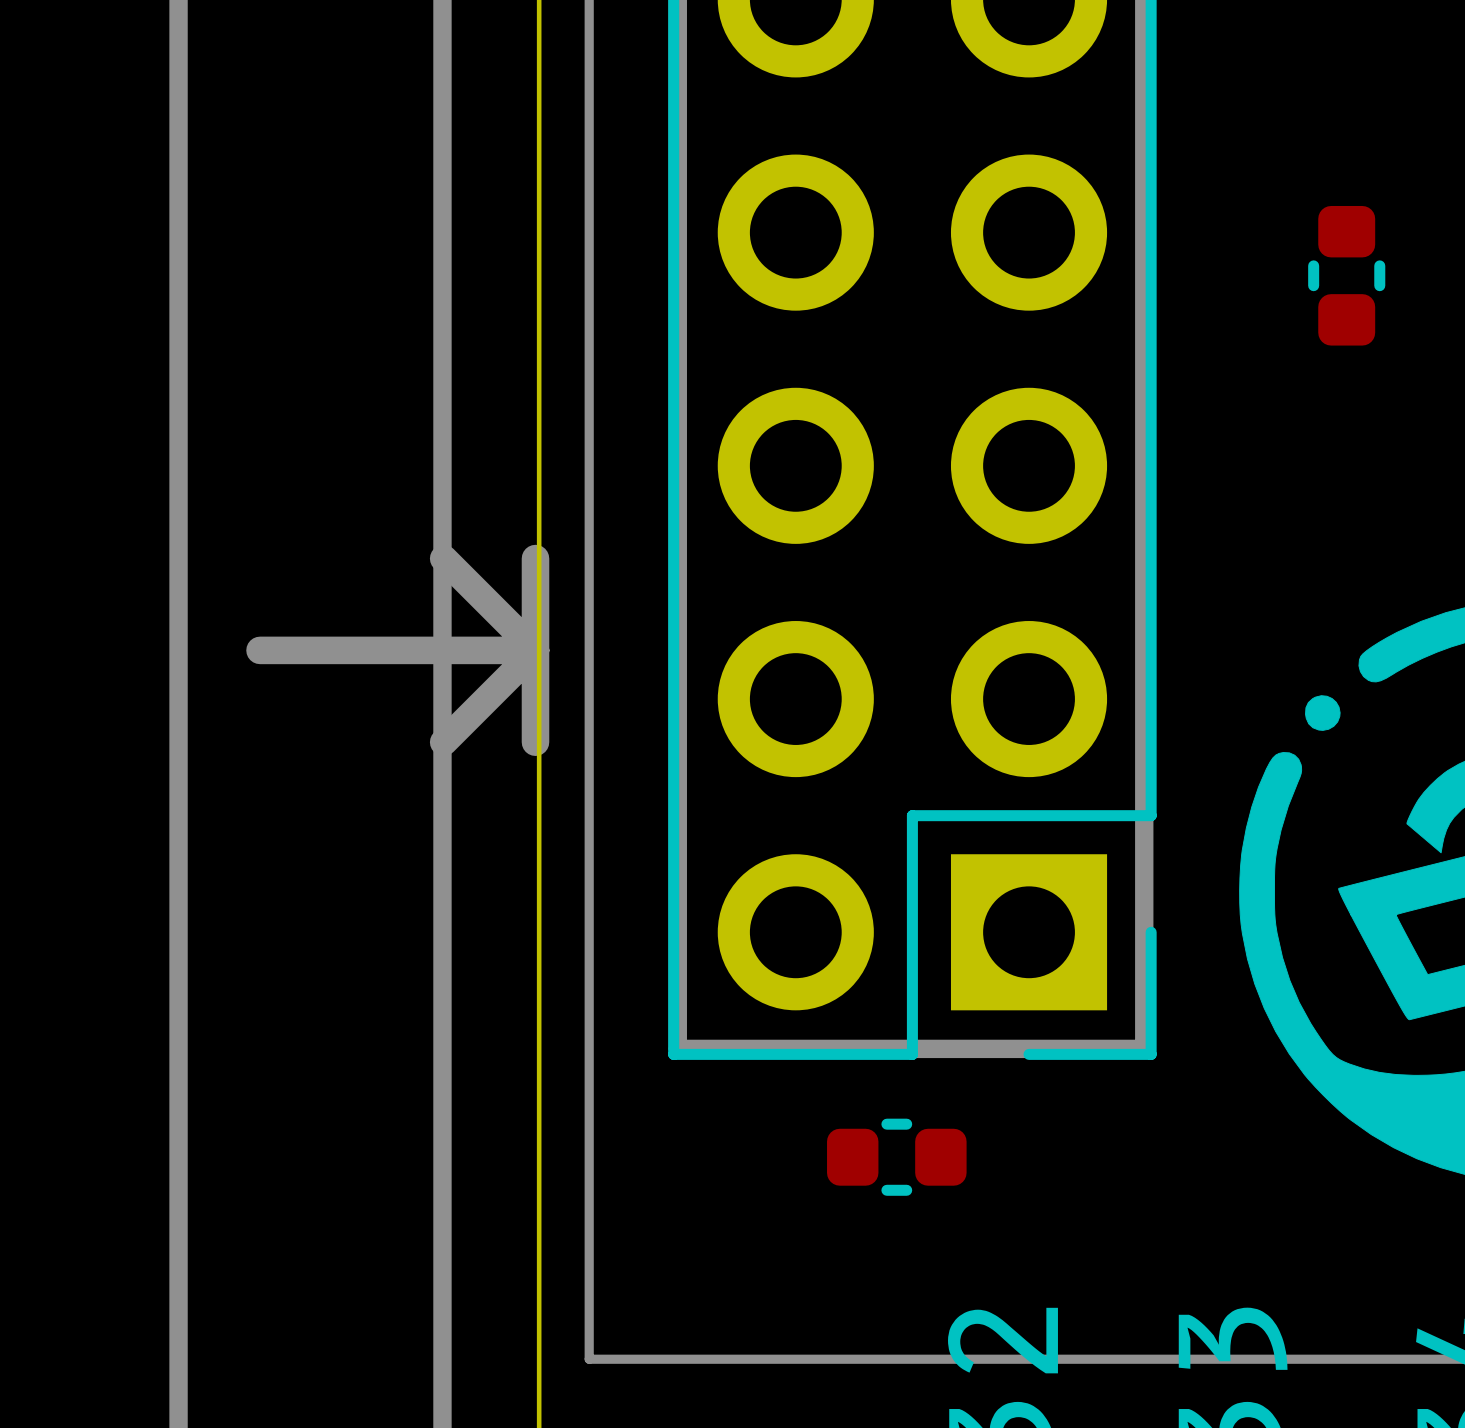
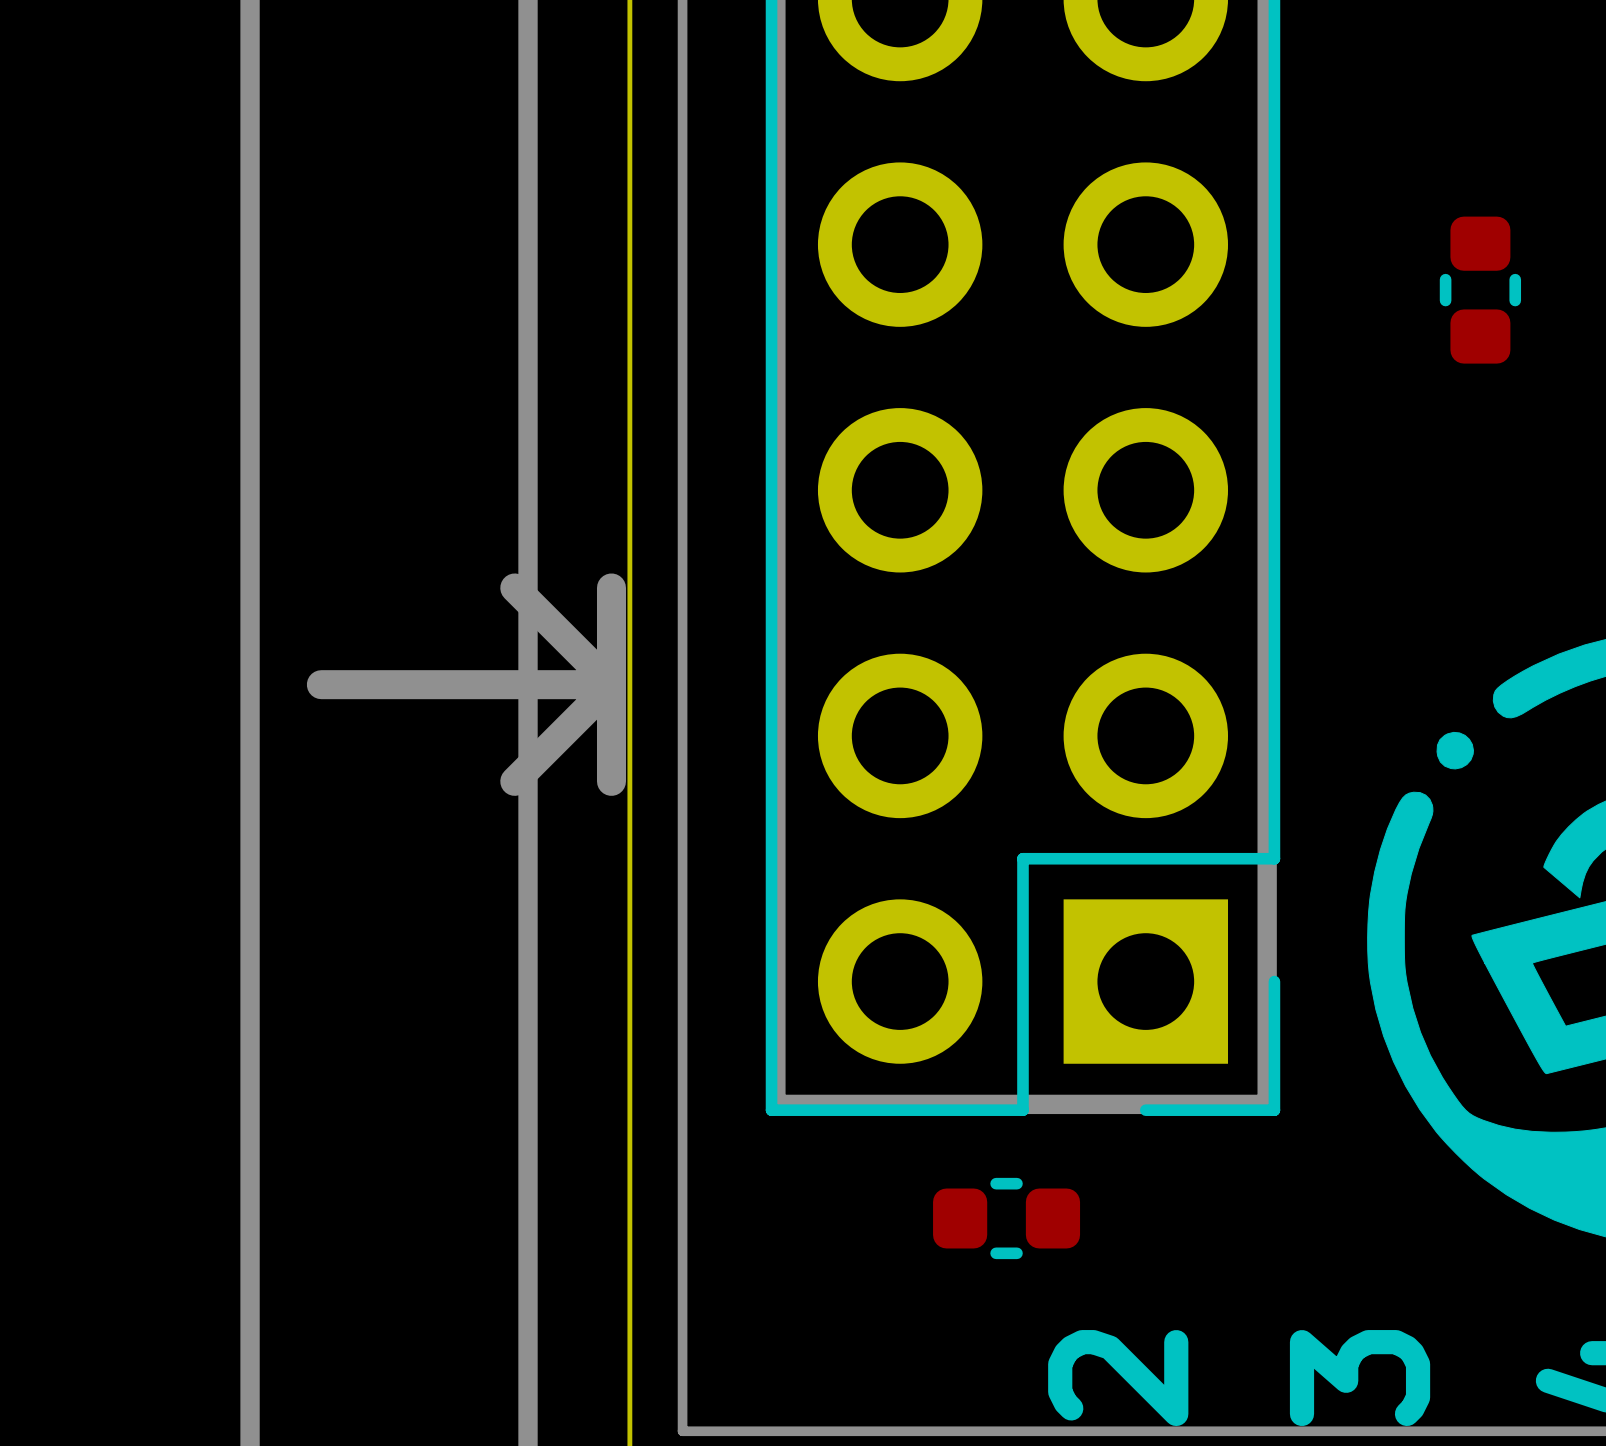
drawing position: (397, 650) -> (466, 684)

